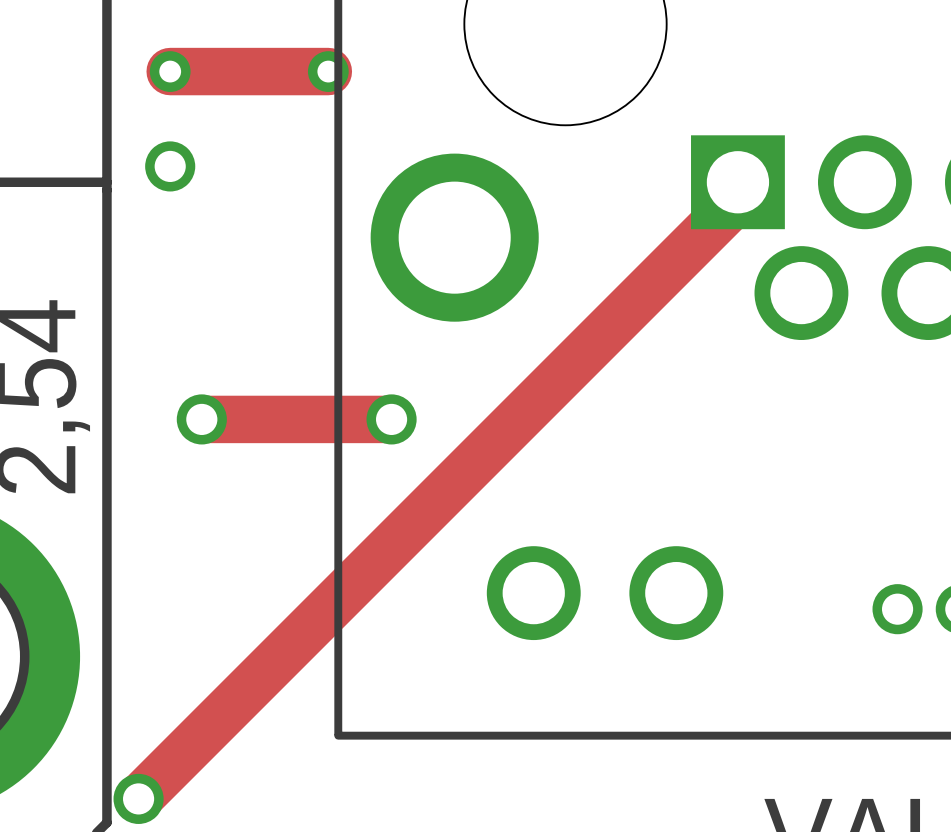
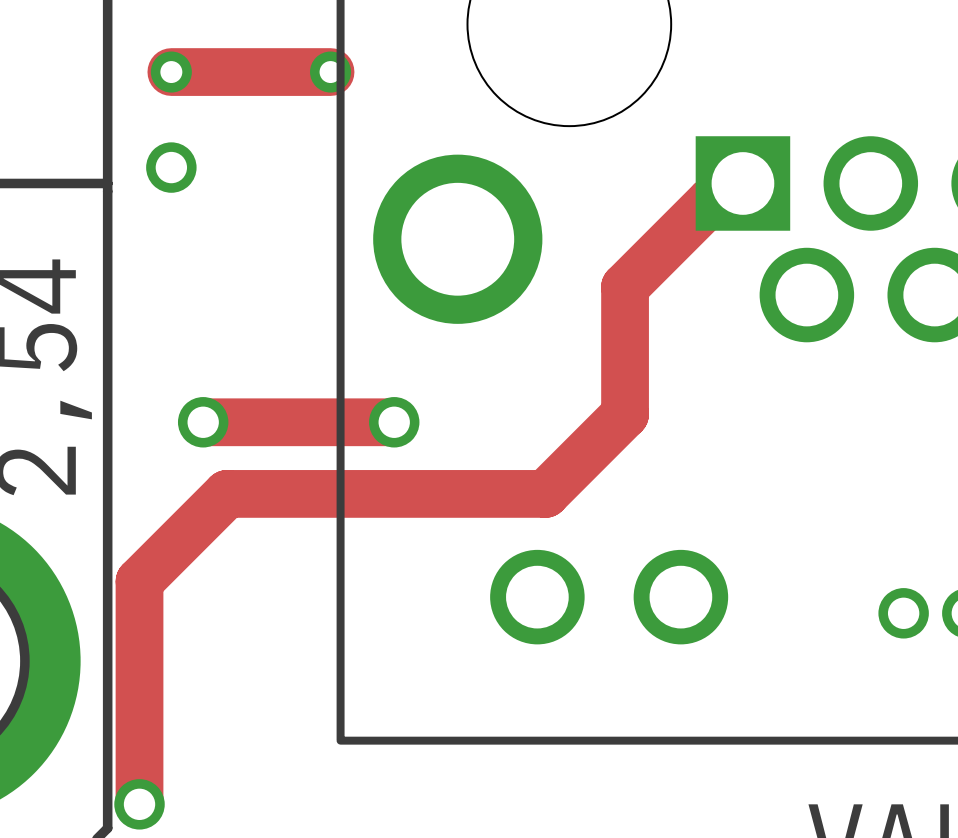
track: (737, 199) (138, 798) -> (742, 200) (711, 200) (625, 286) (625, 414) (545, 493) (227, 493) (139, 581) (139, 804)

